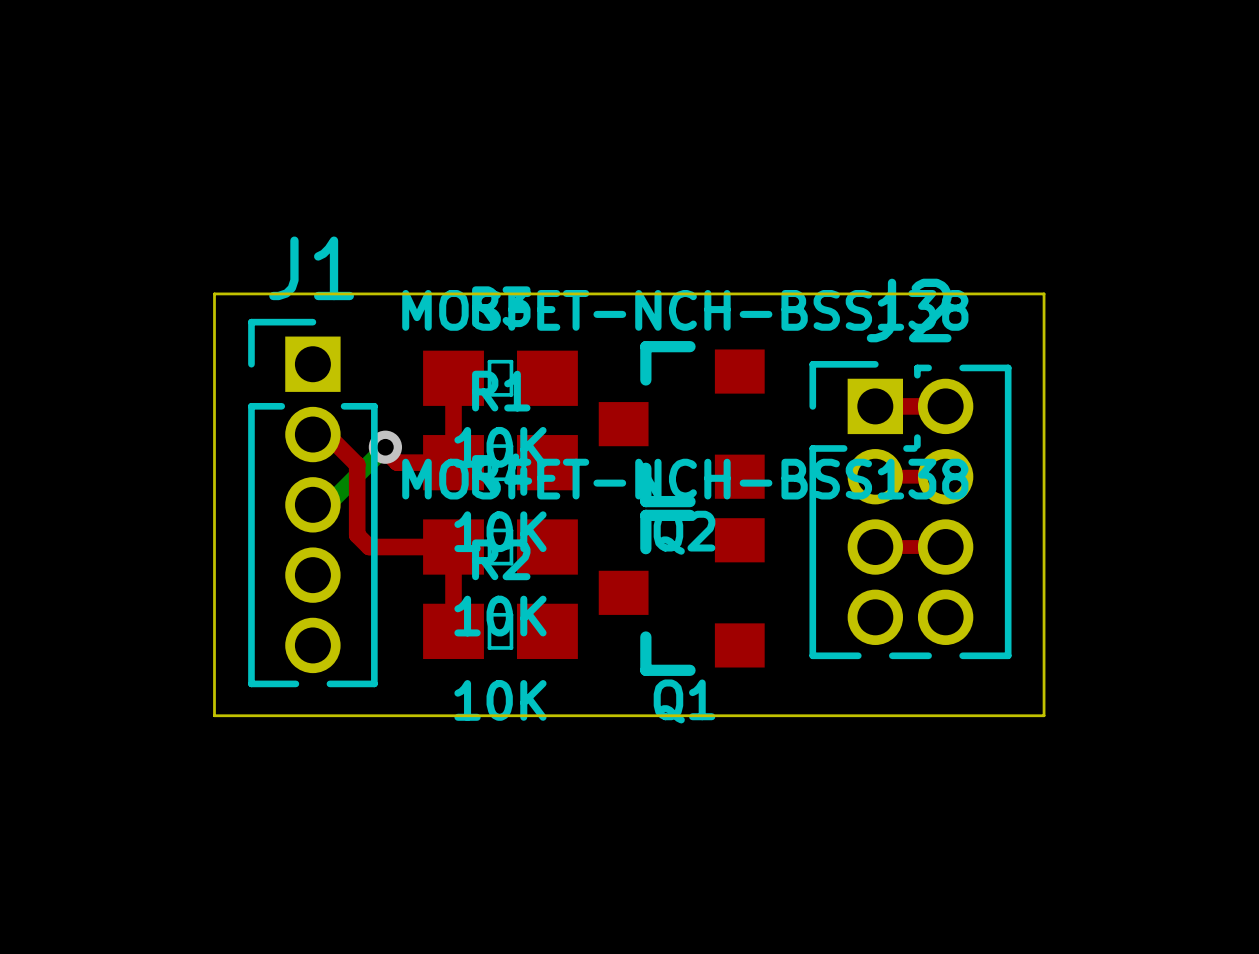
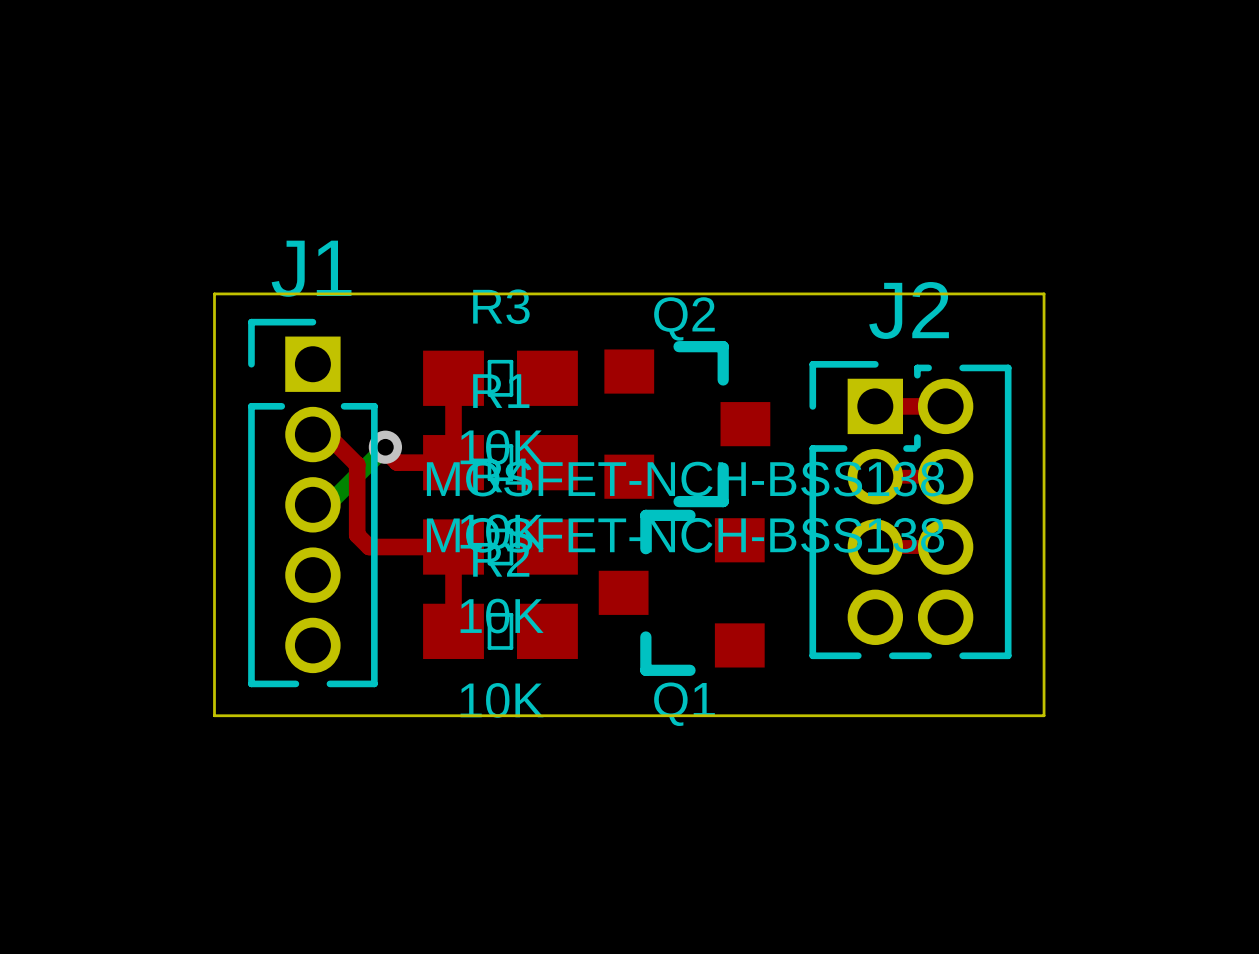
Q2 rotation: 0° (681, 424) -> 180° (687, 424)

